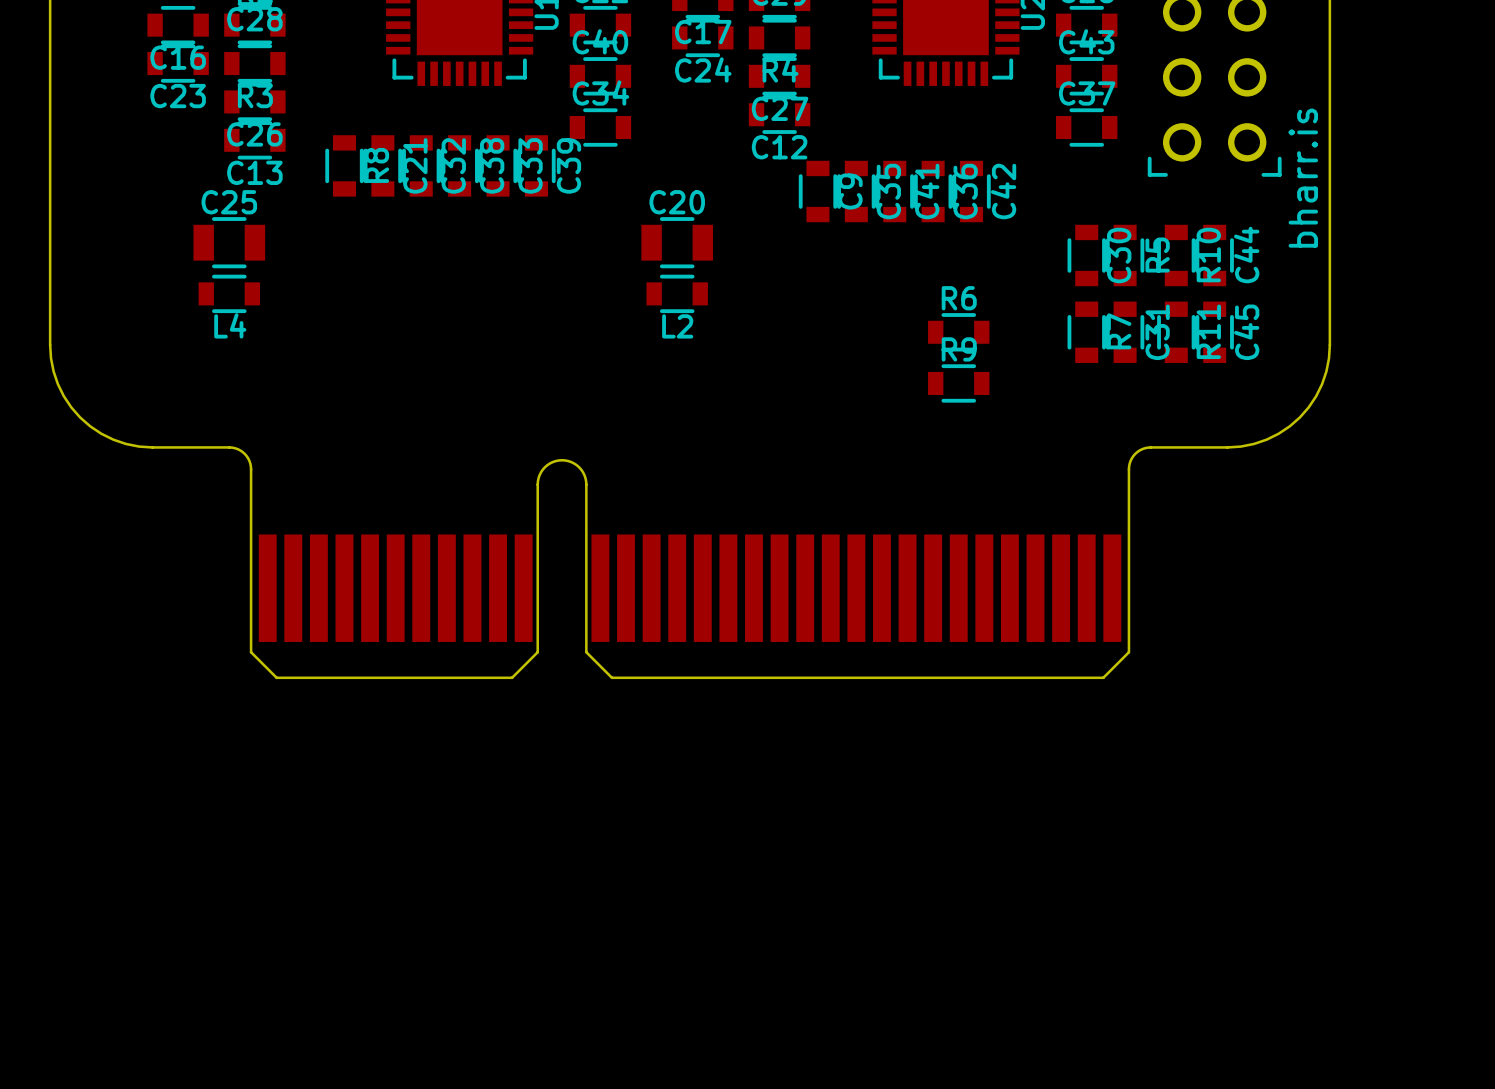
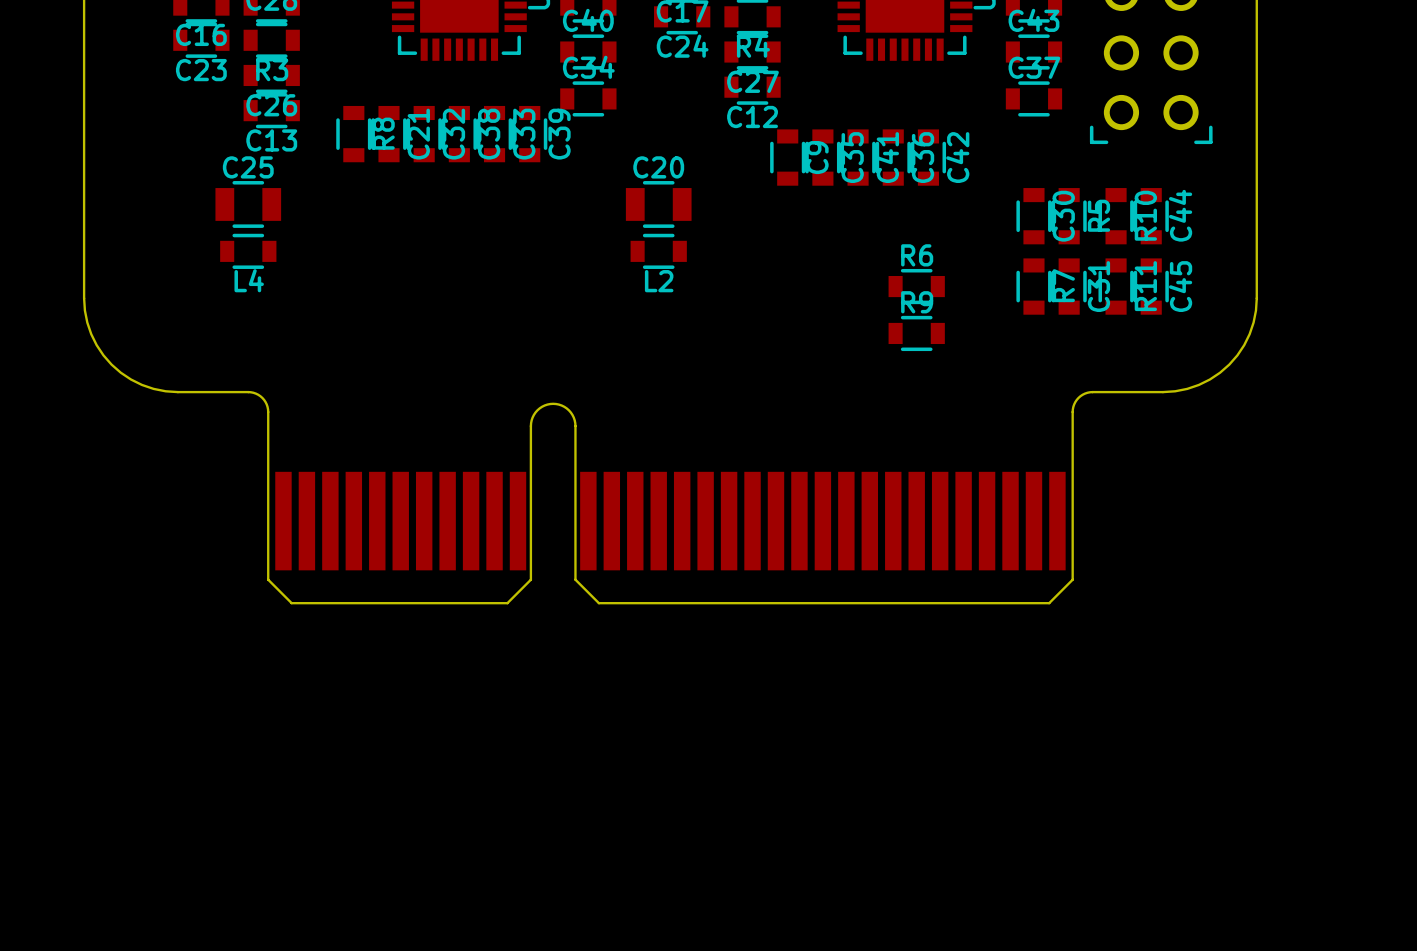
text: bharr.is (1303, 178) -> none

